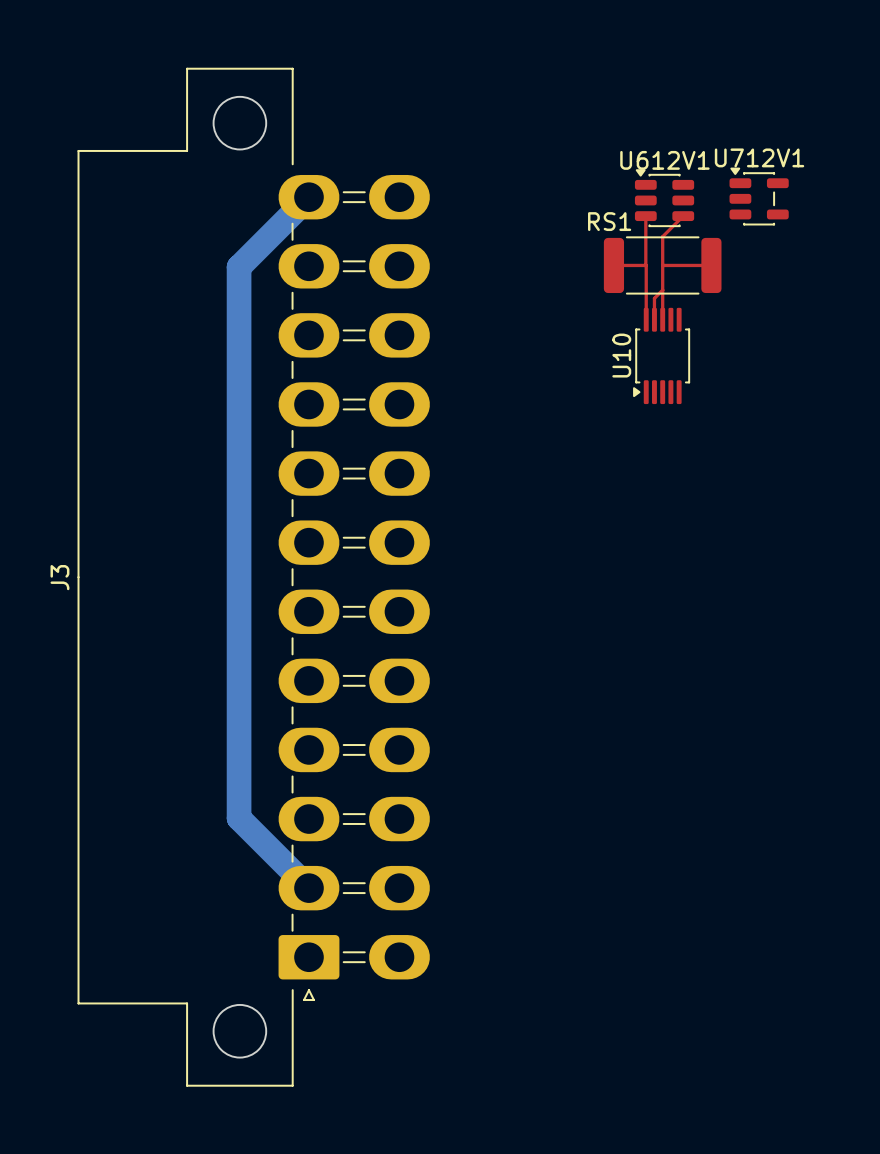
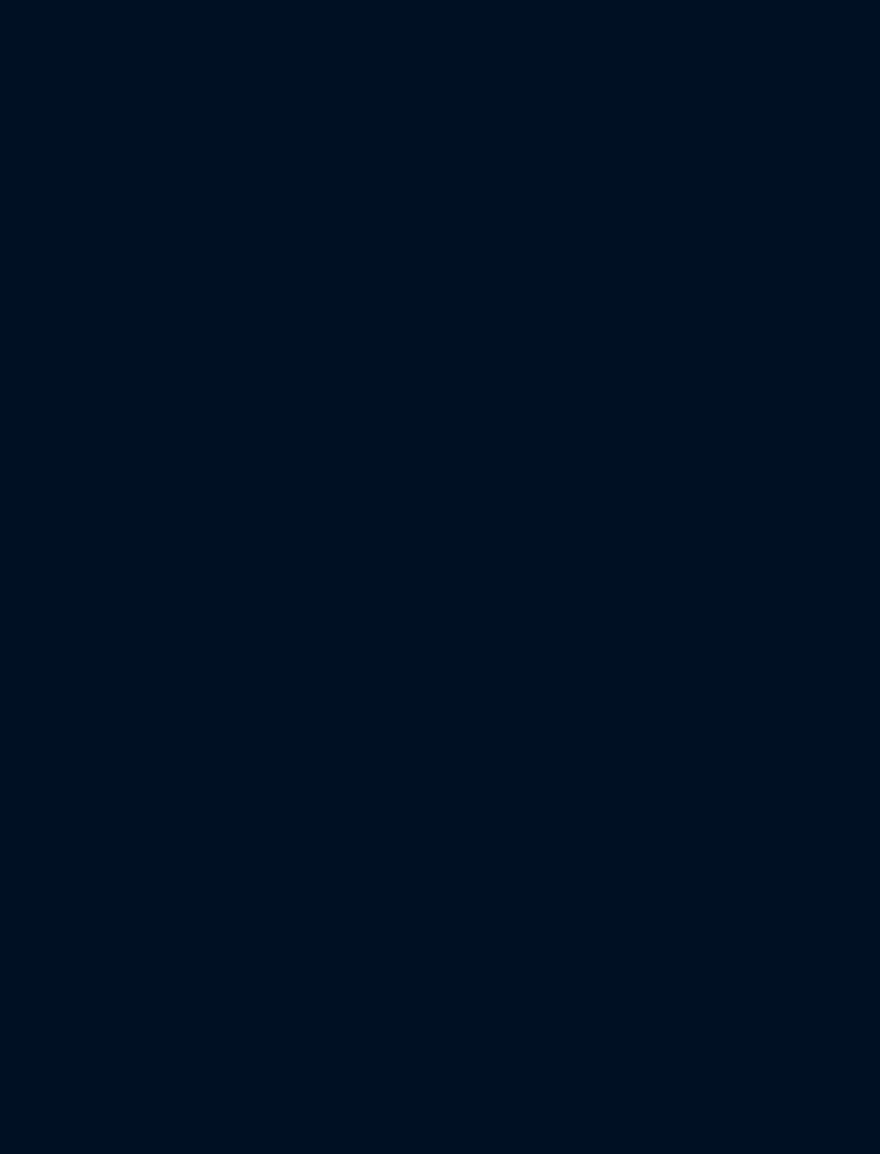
U712V1: (759, 196) -> none
bottom track: (308, 197) (239, 267) (239, 818) (308, 888) -> none
U612V1: (664, 198) -> none
top track: (645, 216) (646, 265) -> none
top track: (683, 216) (662, 236) (662, 319) -> none
top track: (613, 265) (646, 265) -> none
top track: (646, 265) (646, 319) -> none
top track: (662, 265) (711, 265) -> none
RS1: (662, 265) -> none
top track: (662, 290) (654, 298) (654, 319) -> none
U10: (661, 355) -> none
J3: (253, 577) -> none

